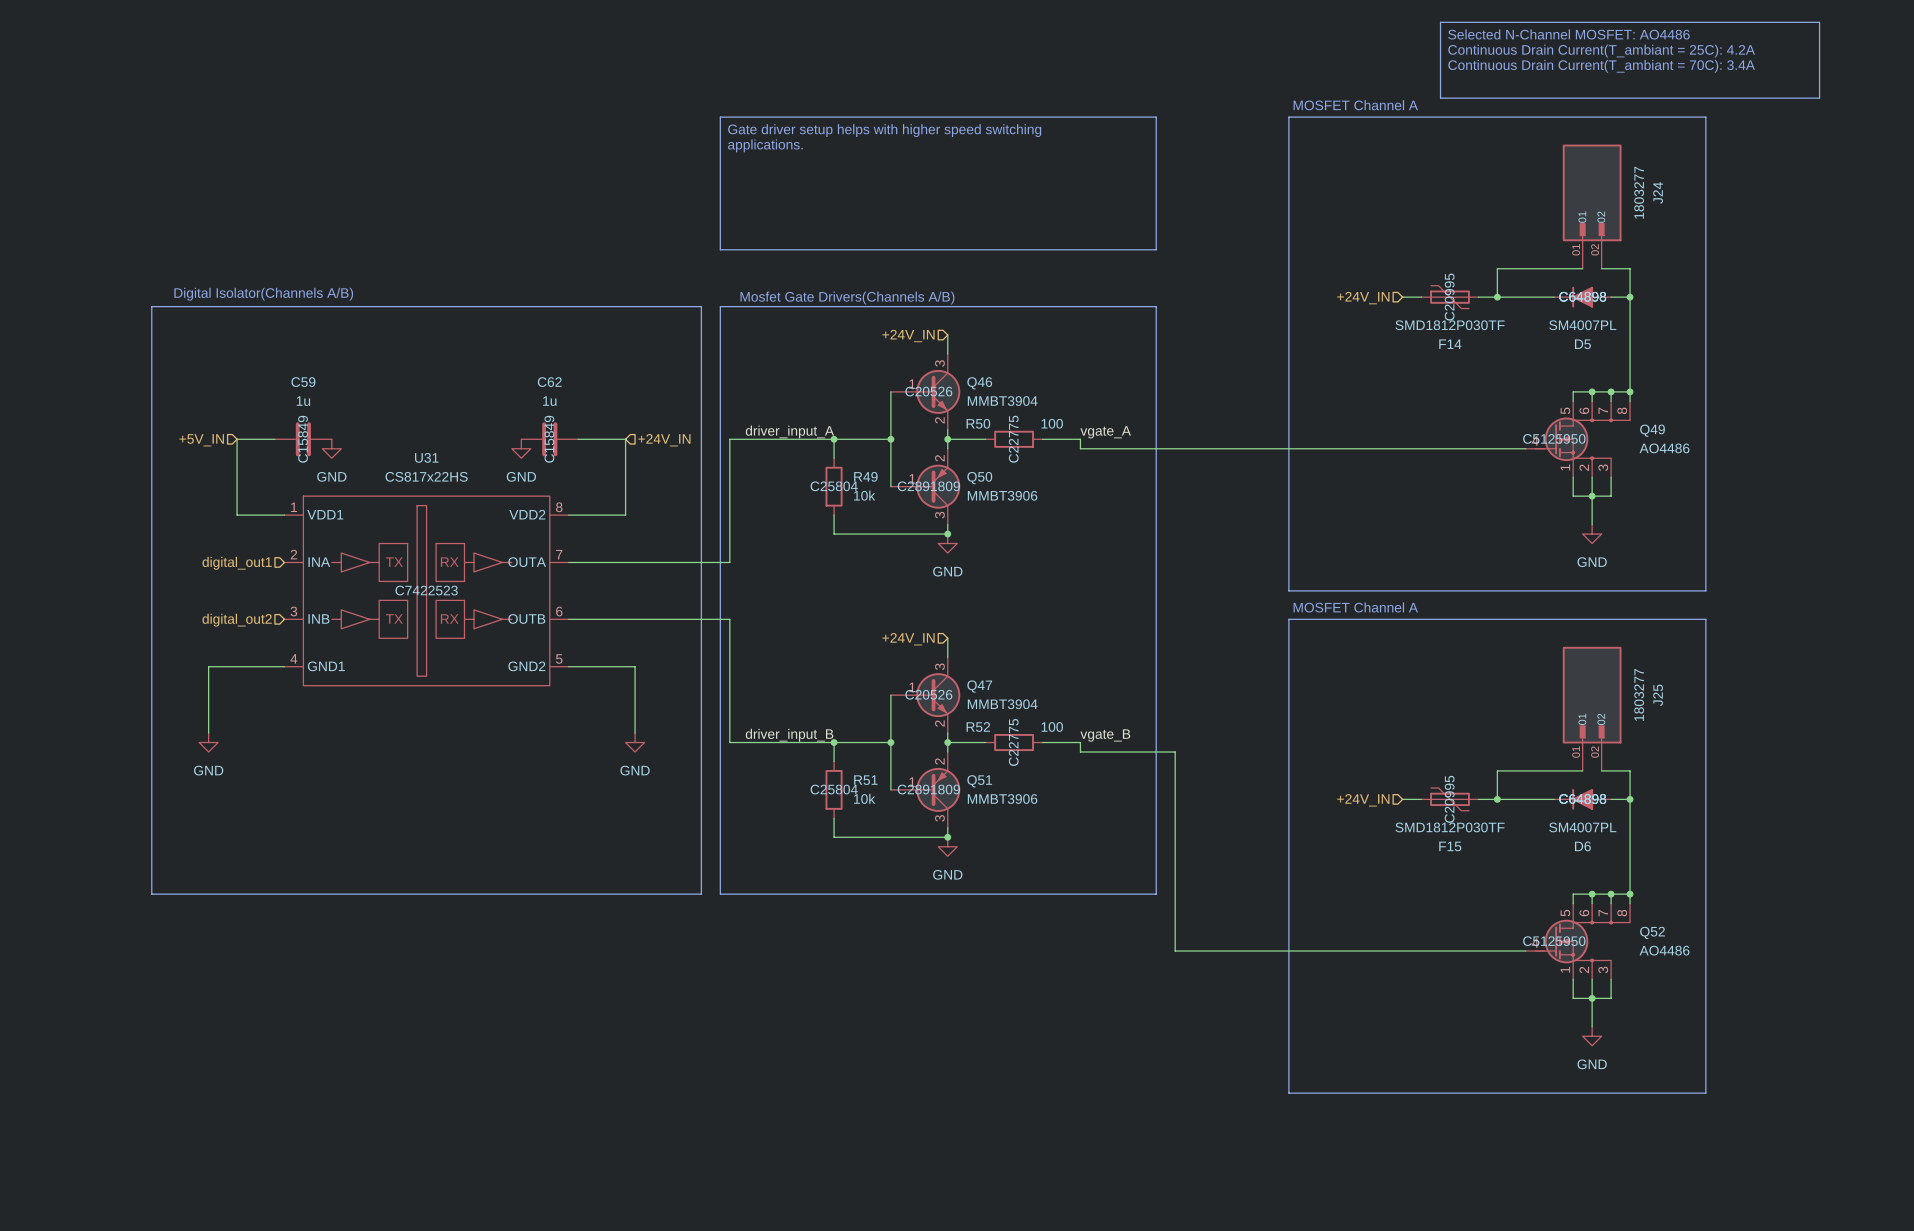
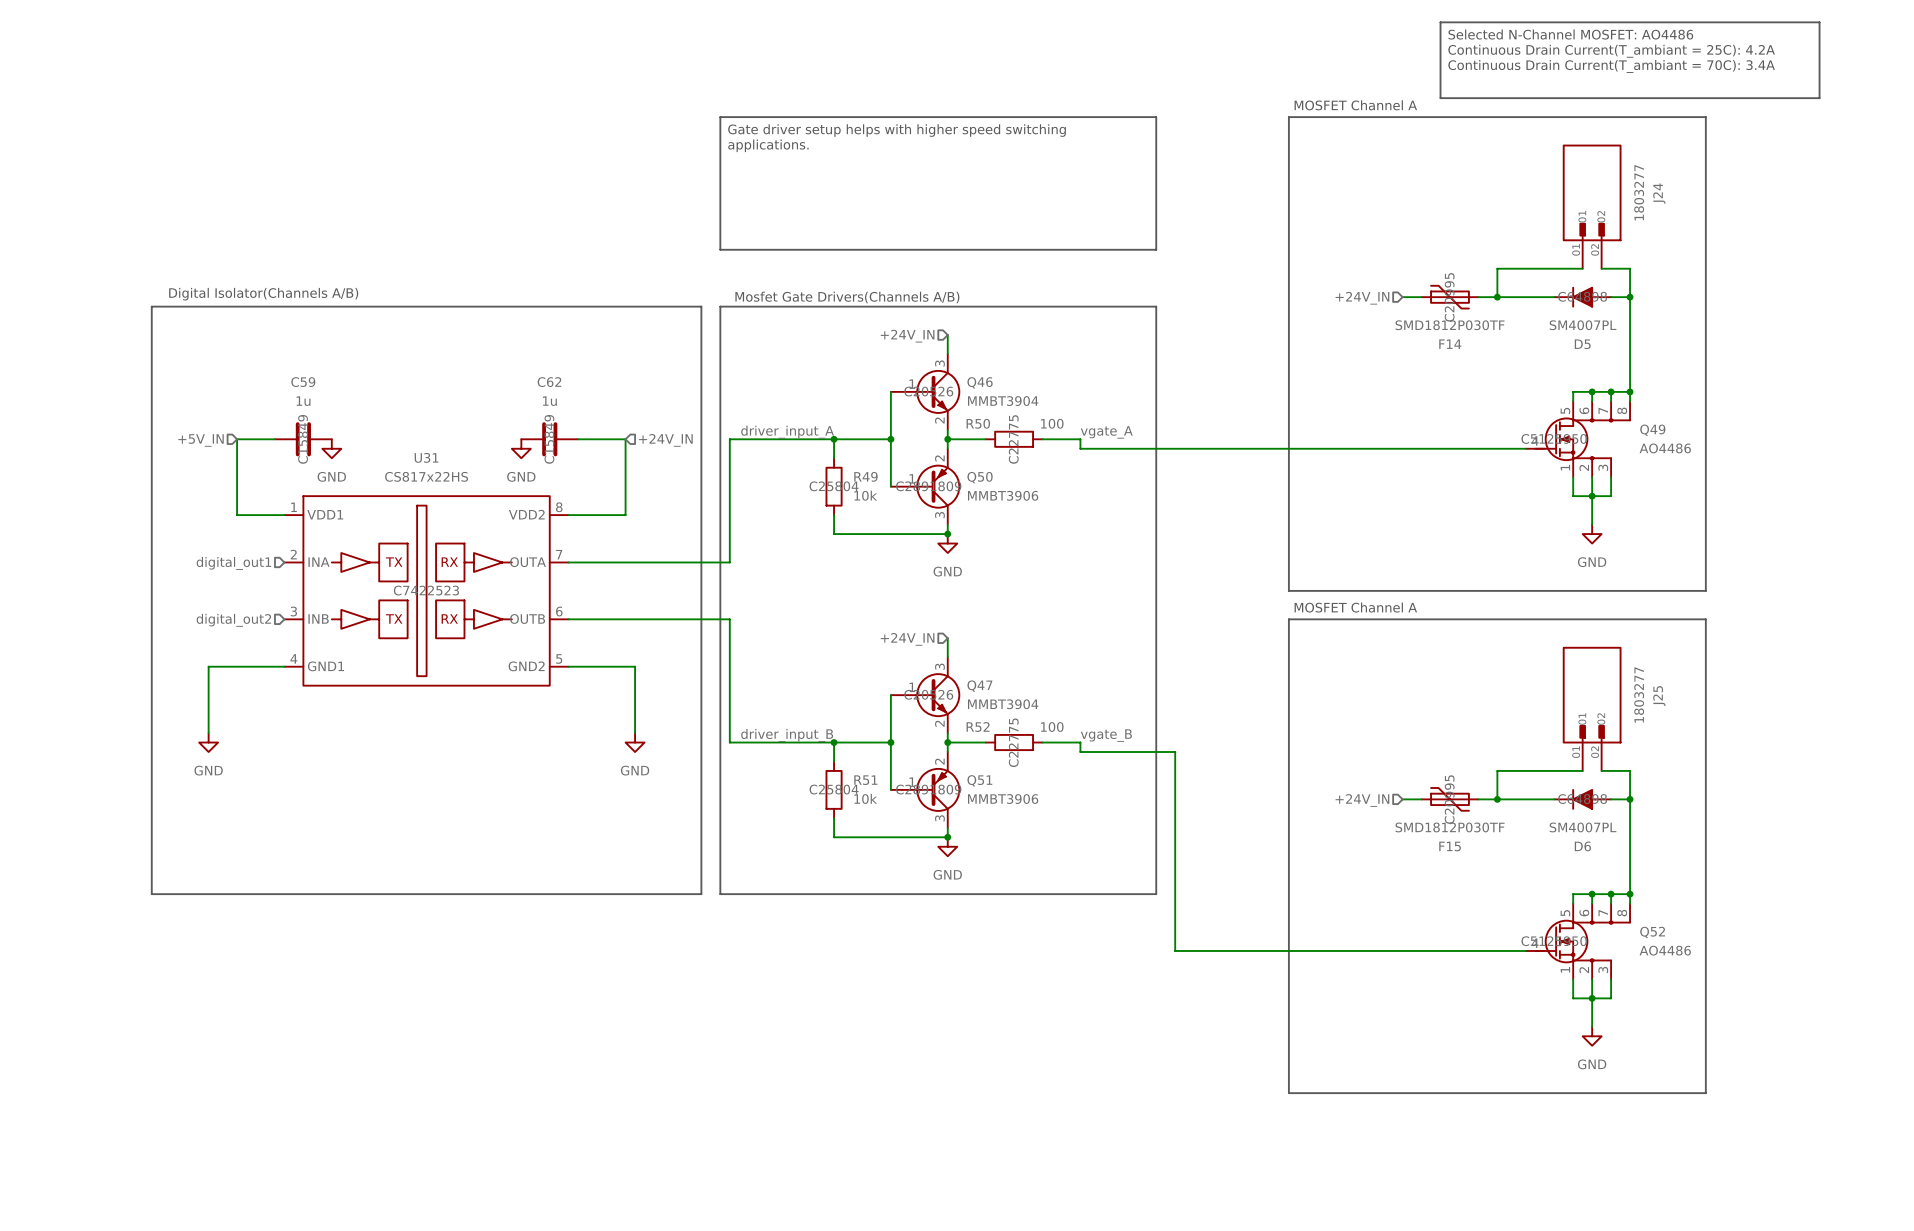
D5 text: C64898 (1582, 296) -> none
D6 text: C64898 (1582, 799) -> none

